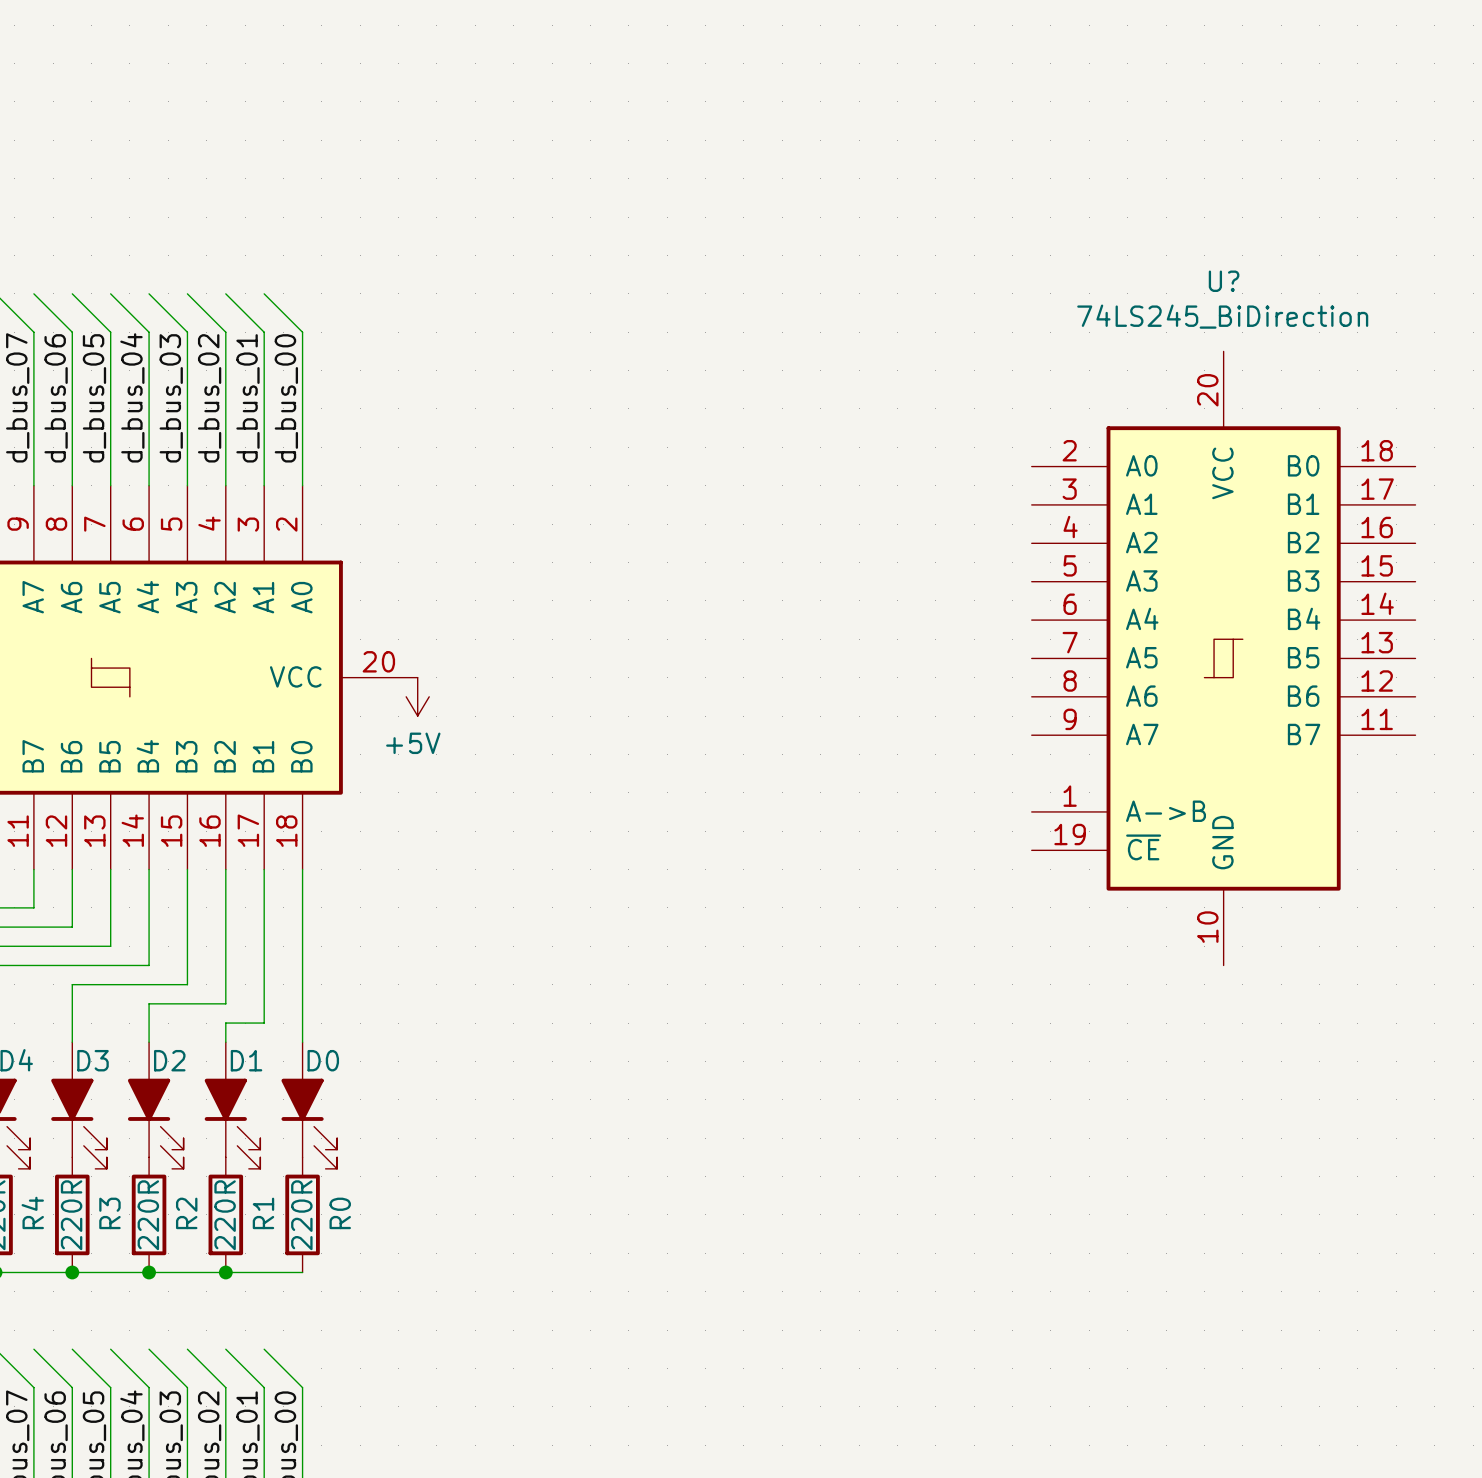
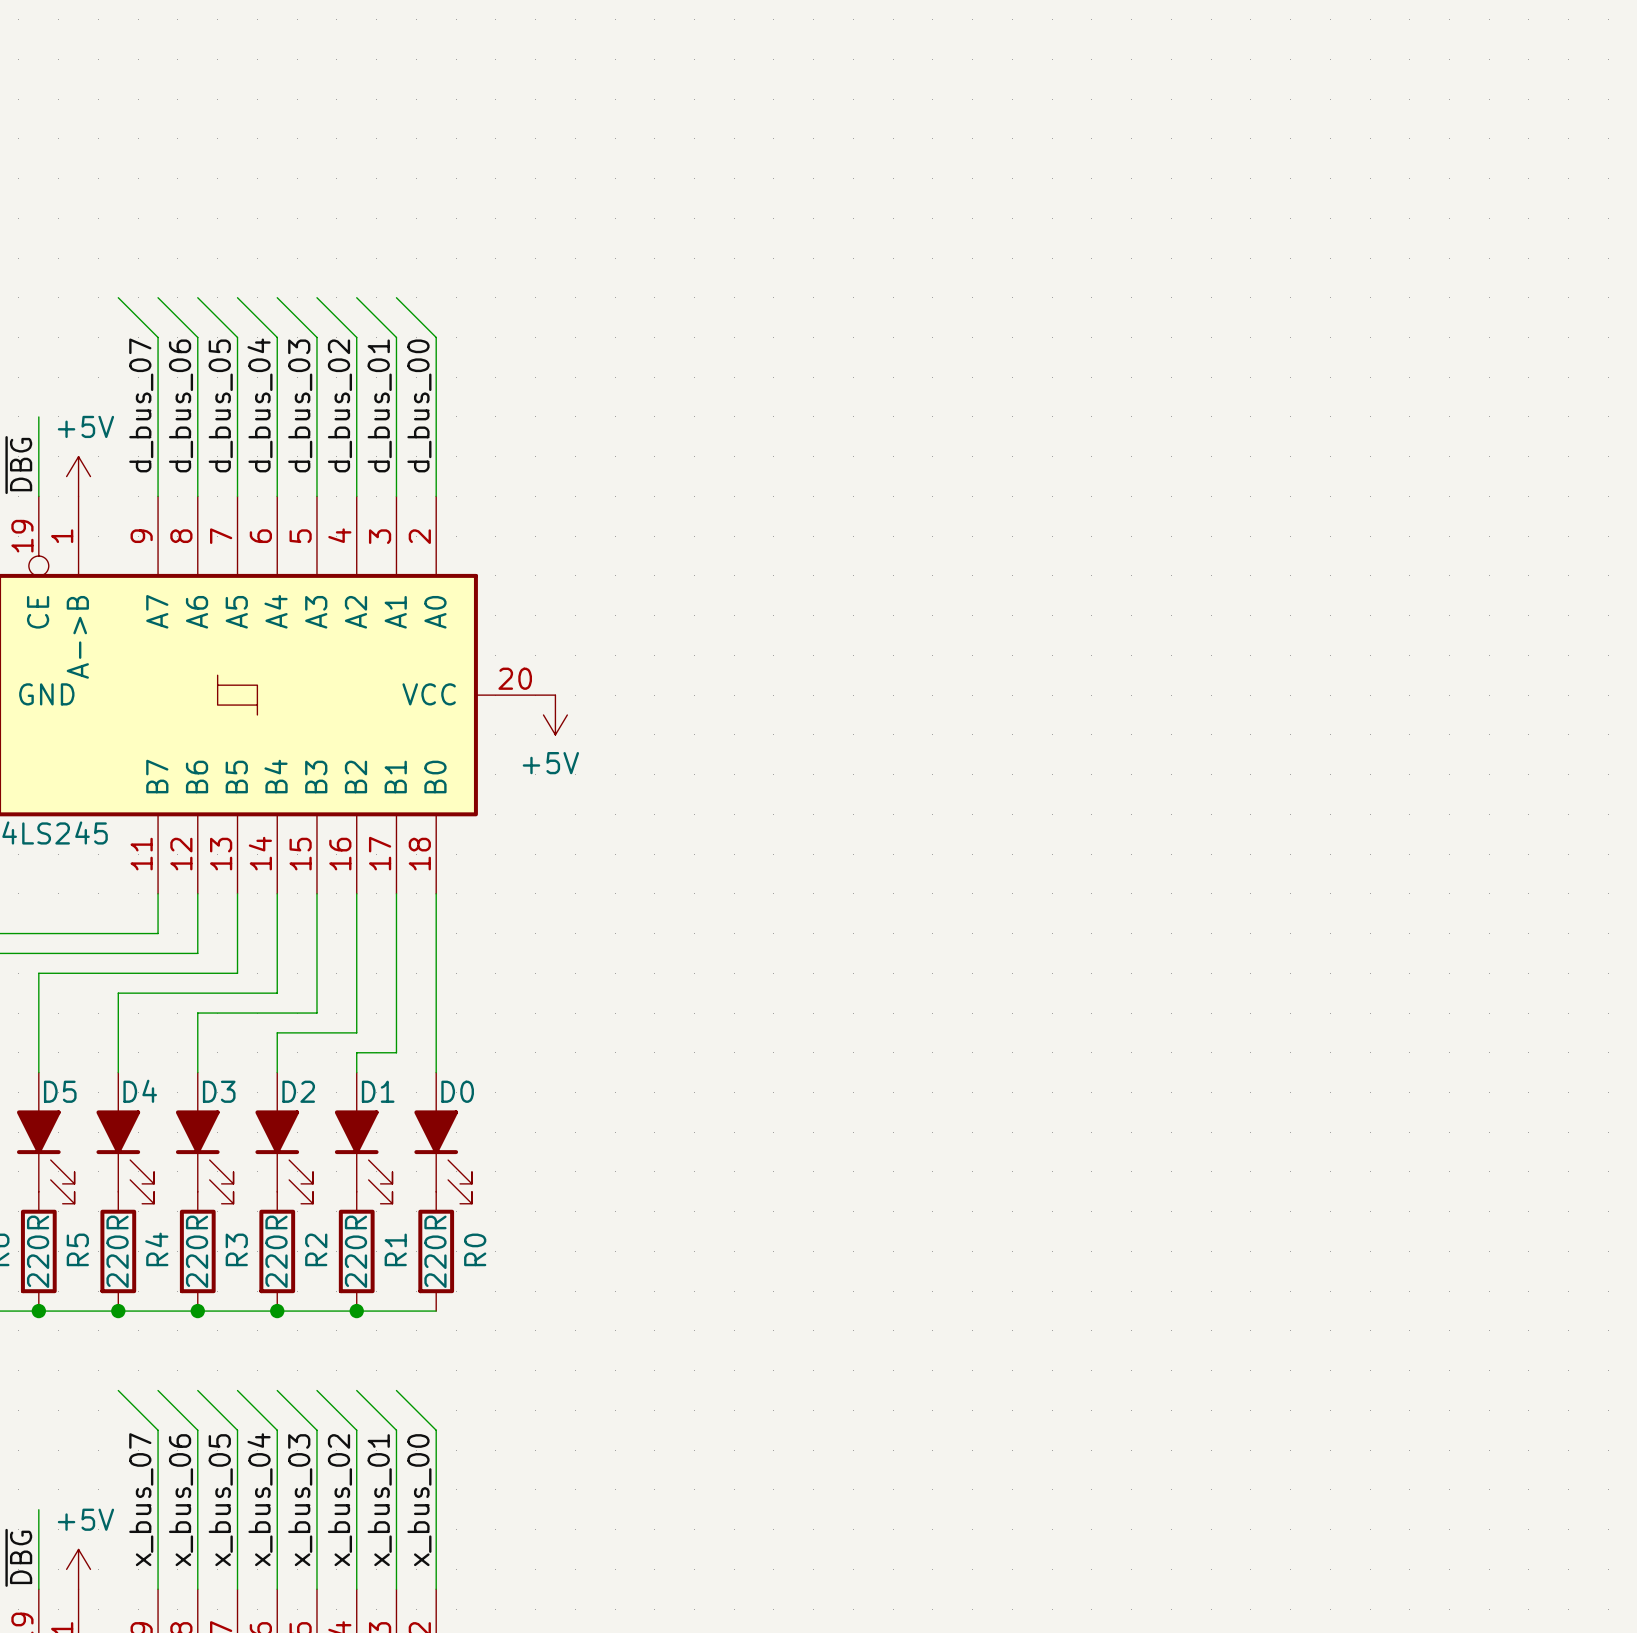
U?: 74LS245_BiDirection (1223, 658) -> none

